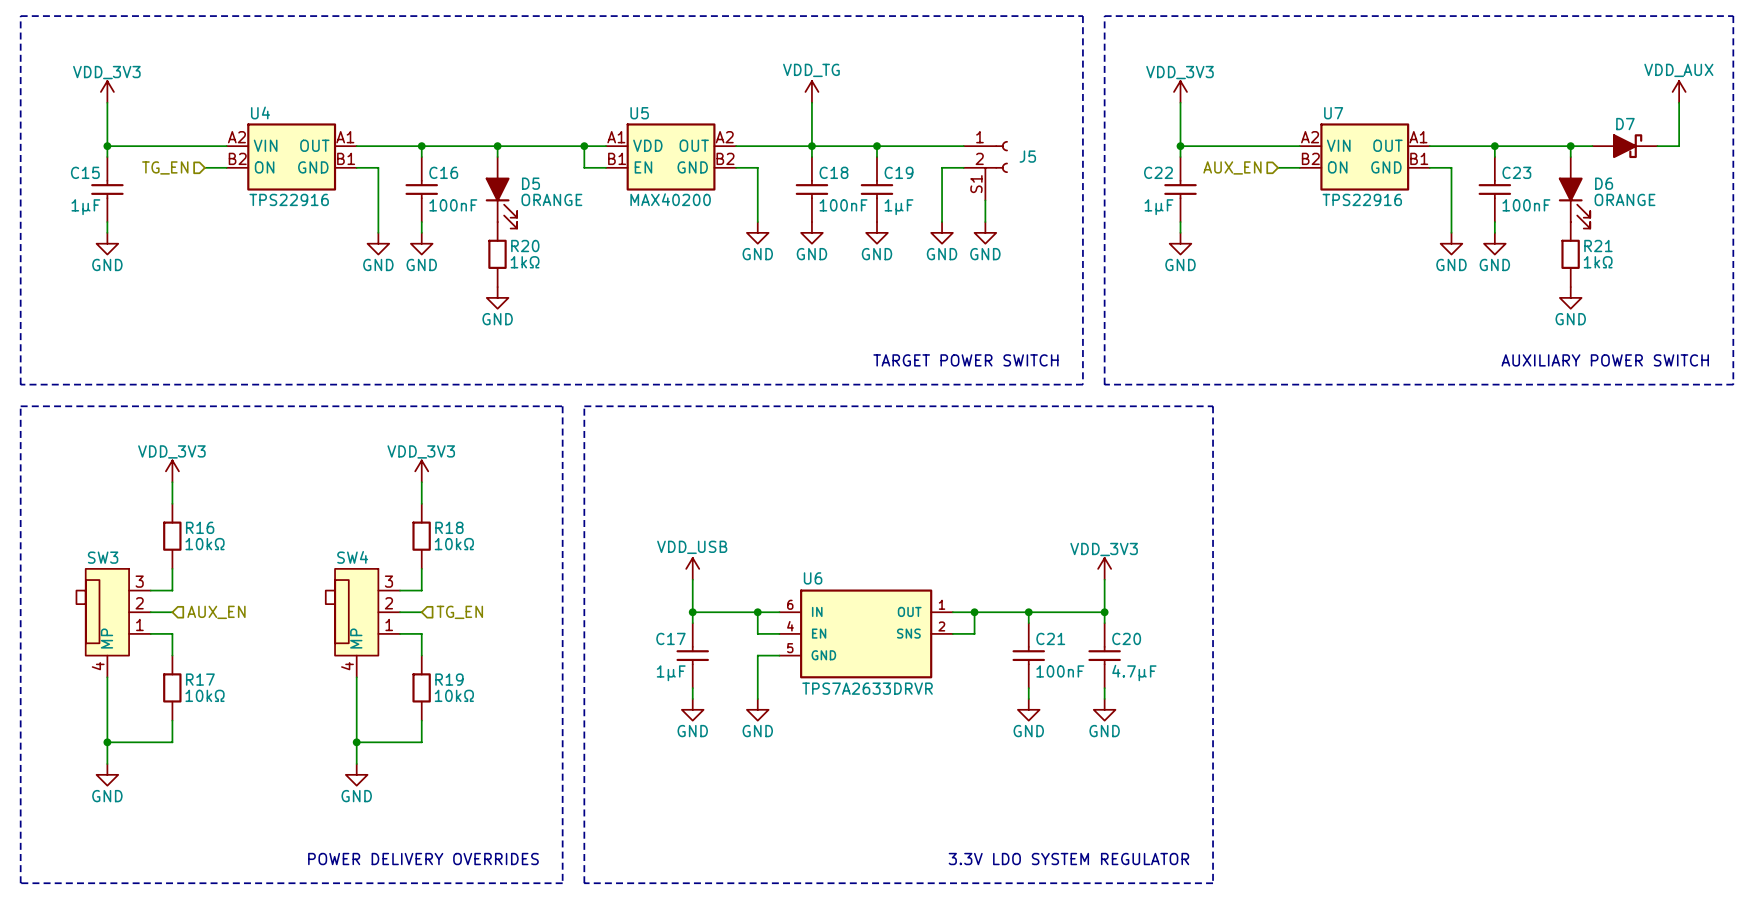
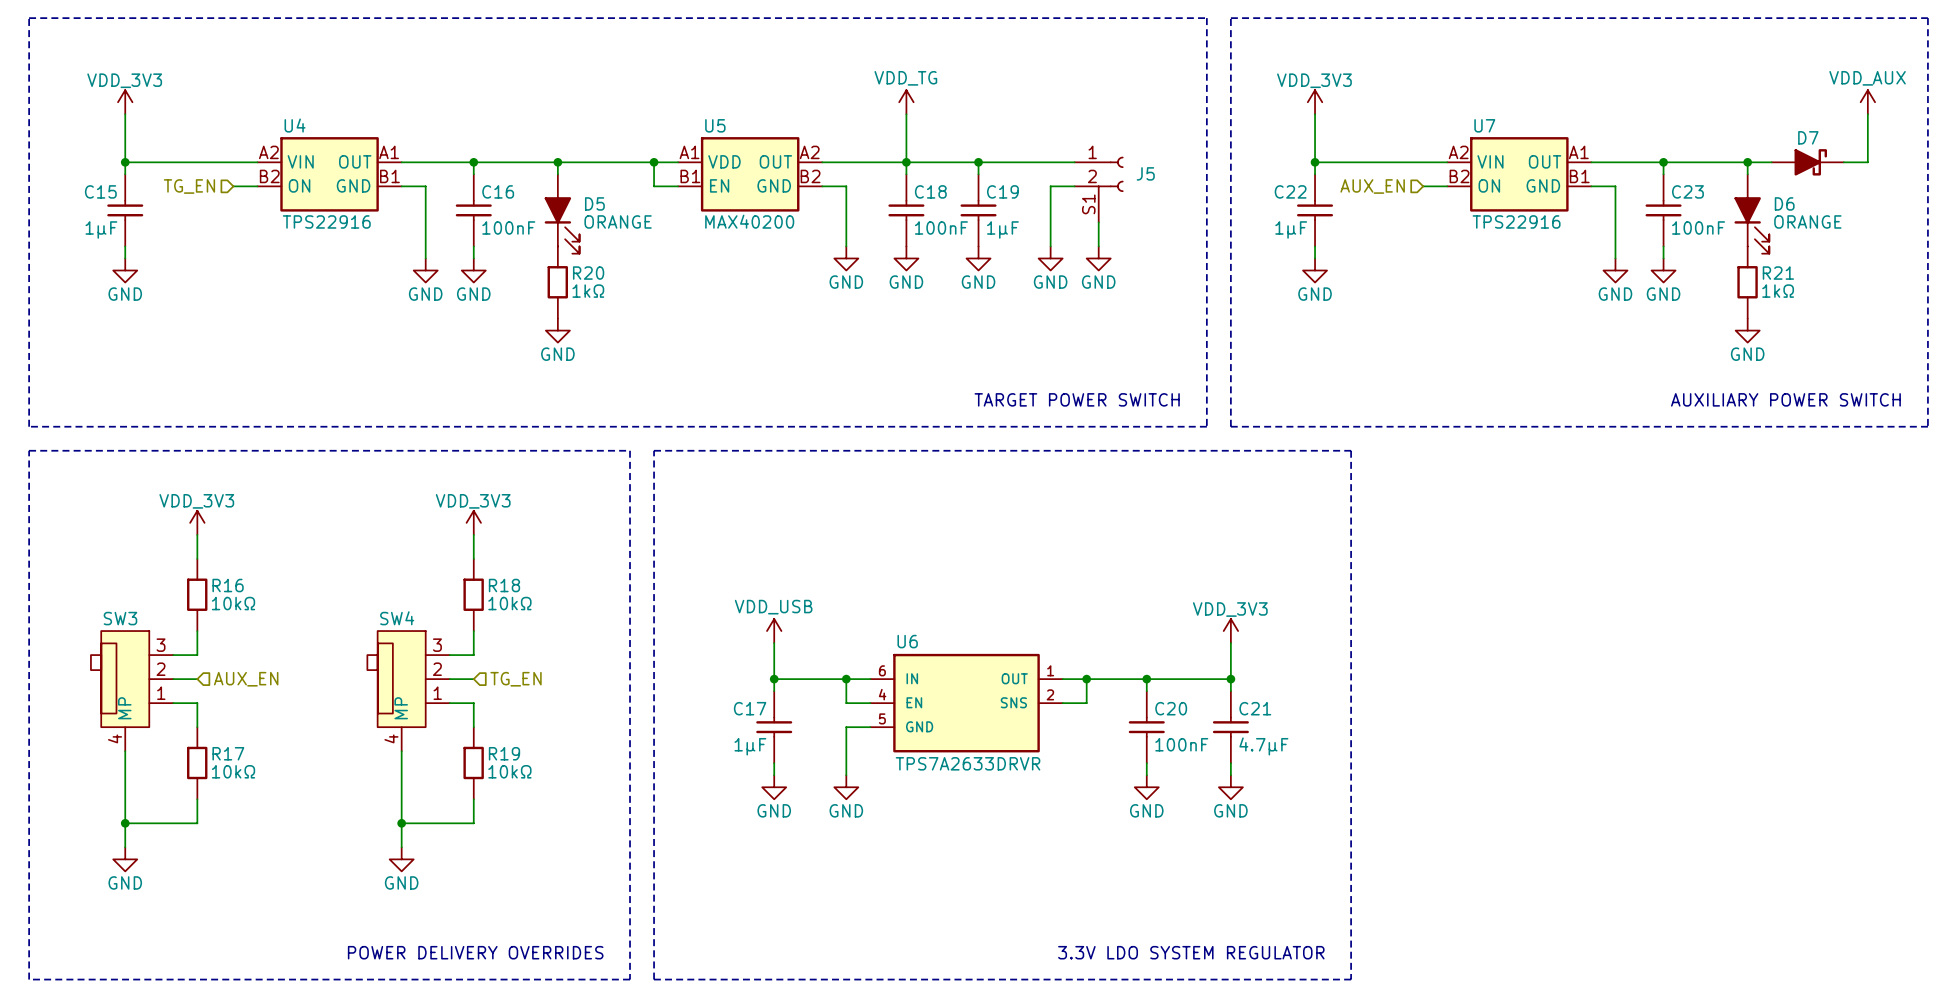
C21 name: C21 (1050, 638) -> C20 (1171, 708)
C20 name: C20 (1126, 638) -> C21 (1255, 708)

